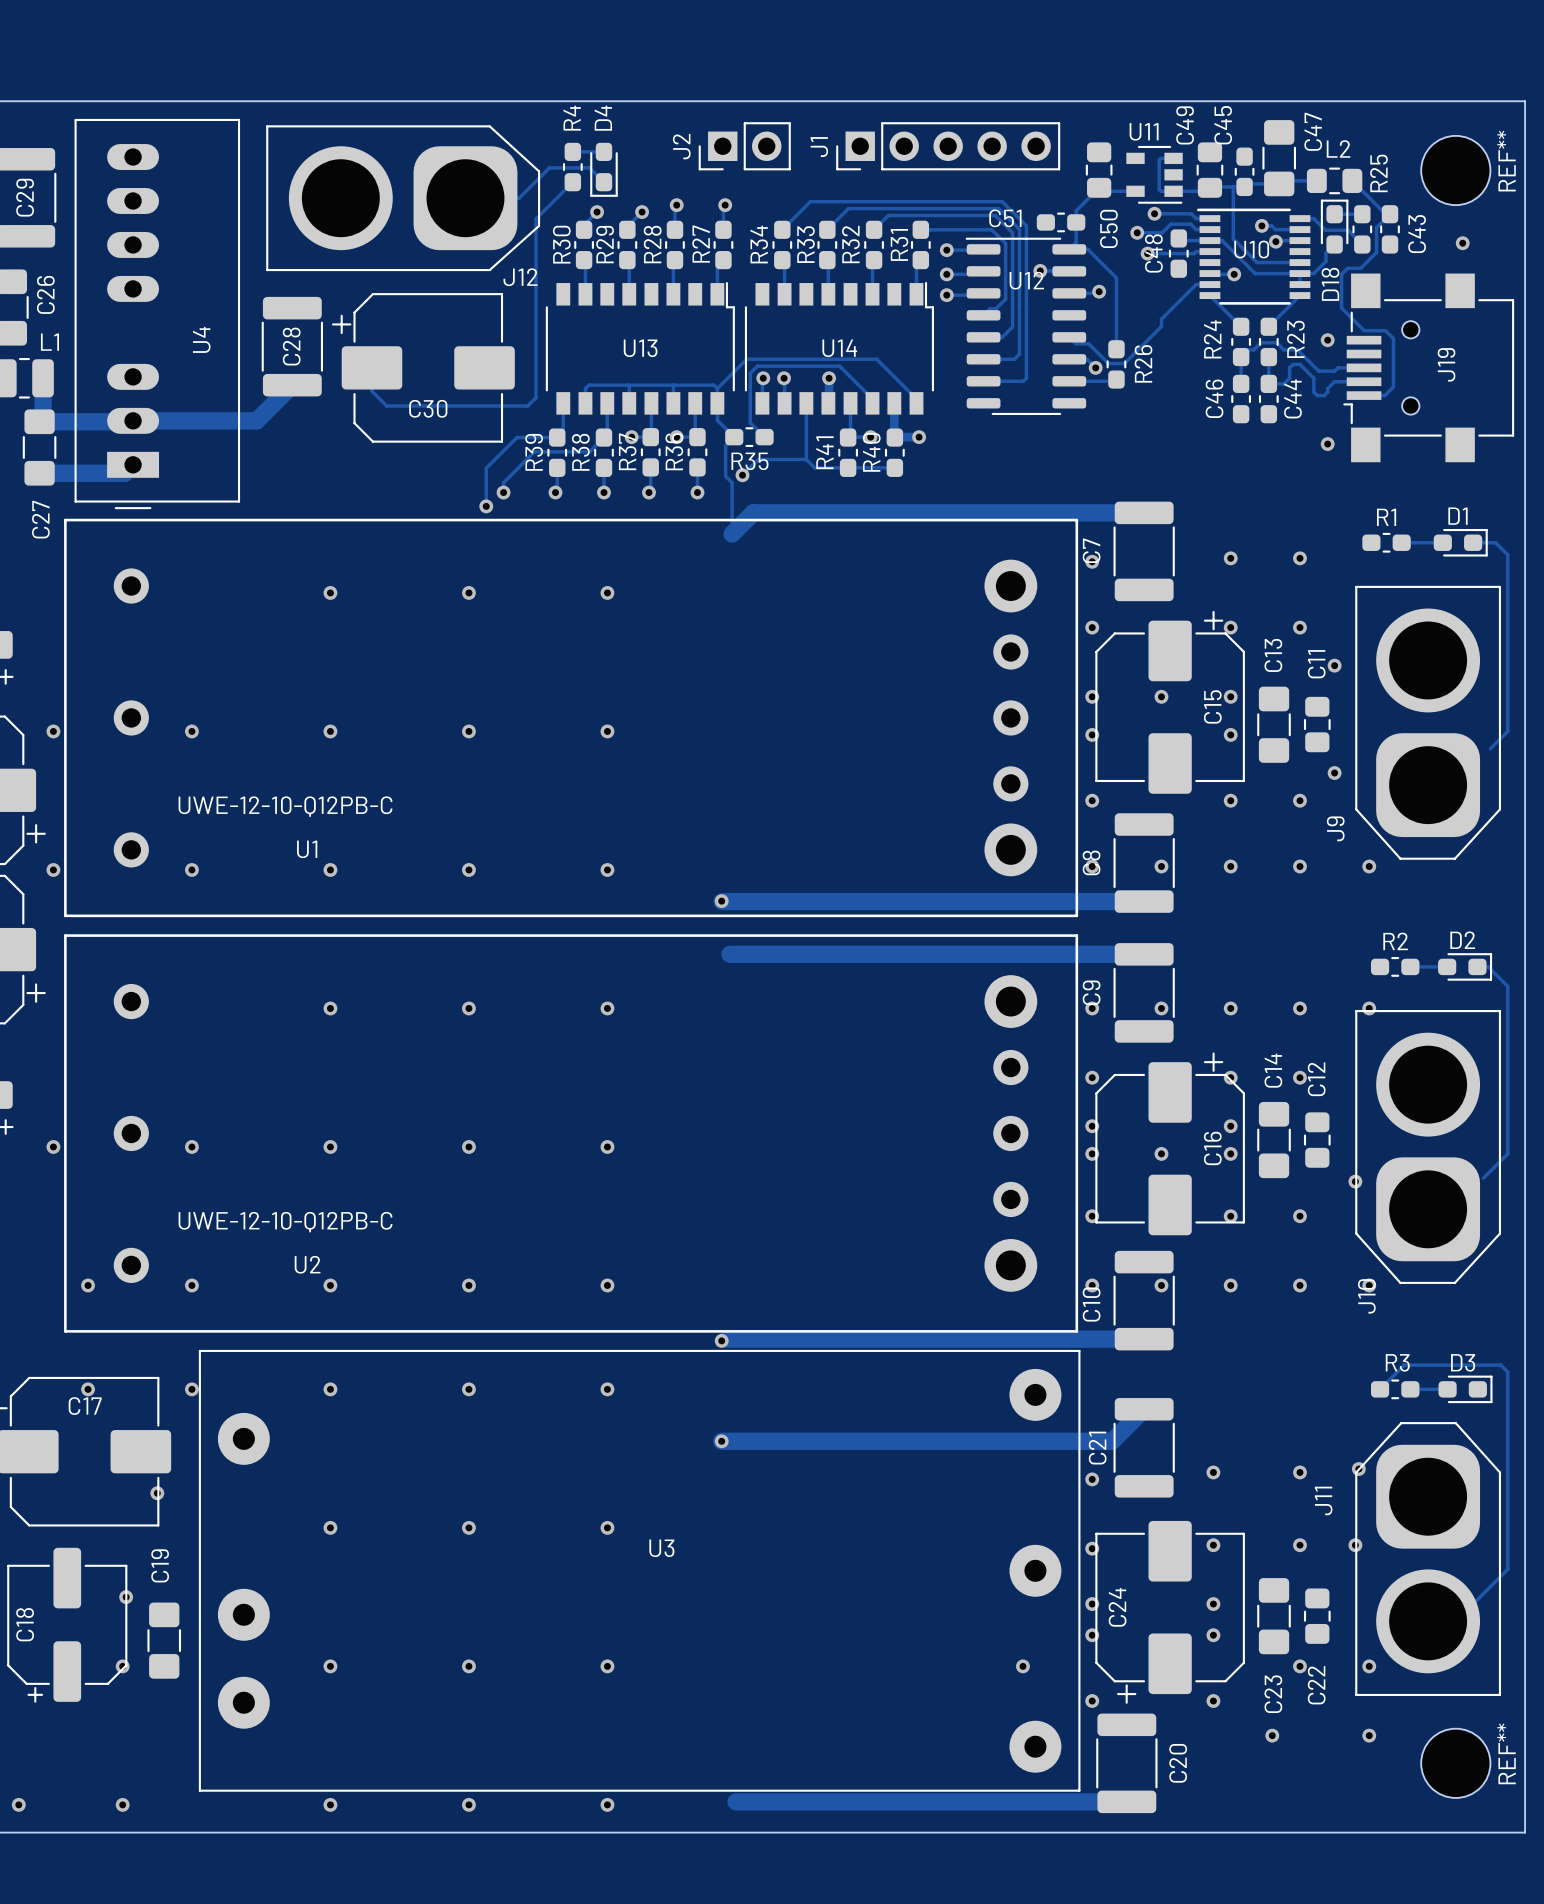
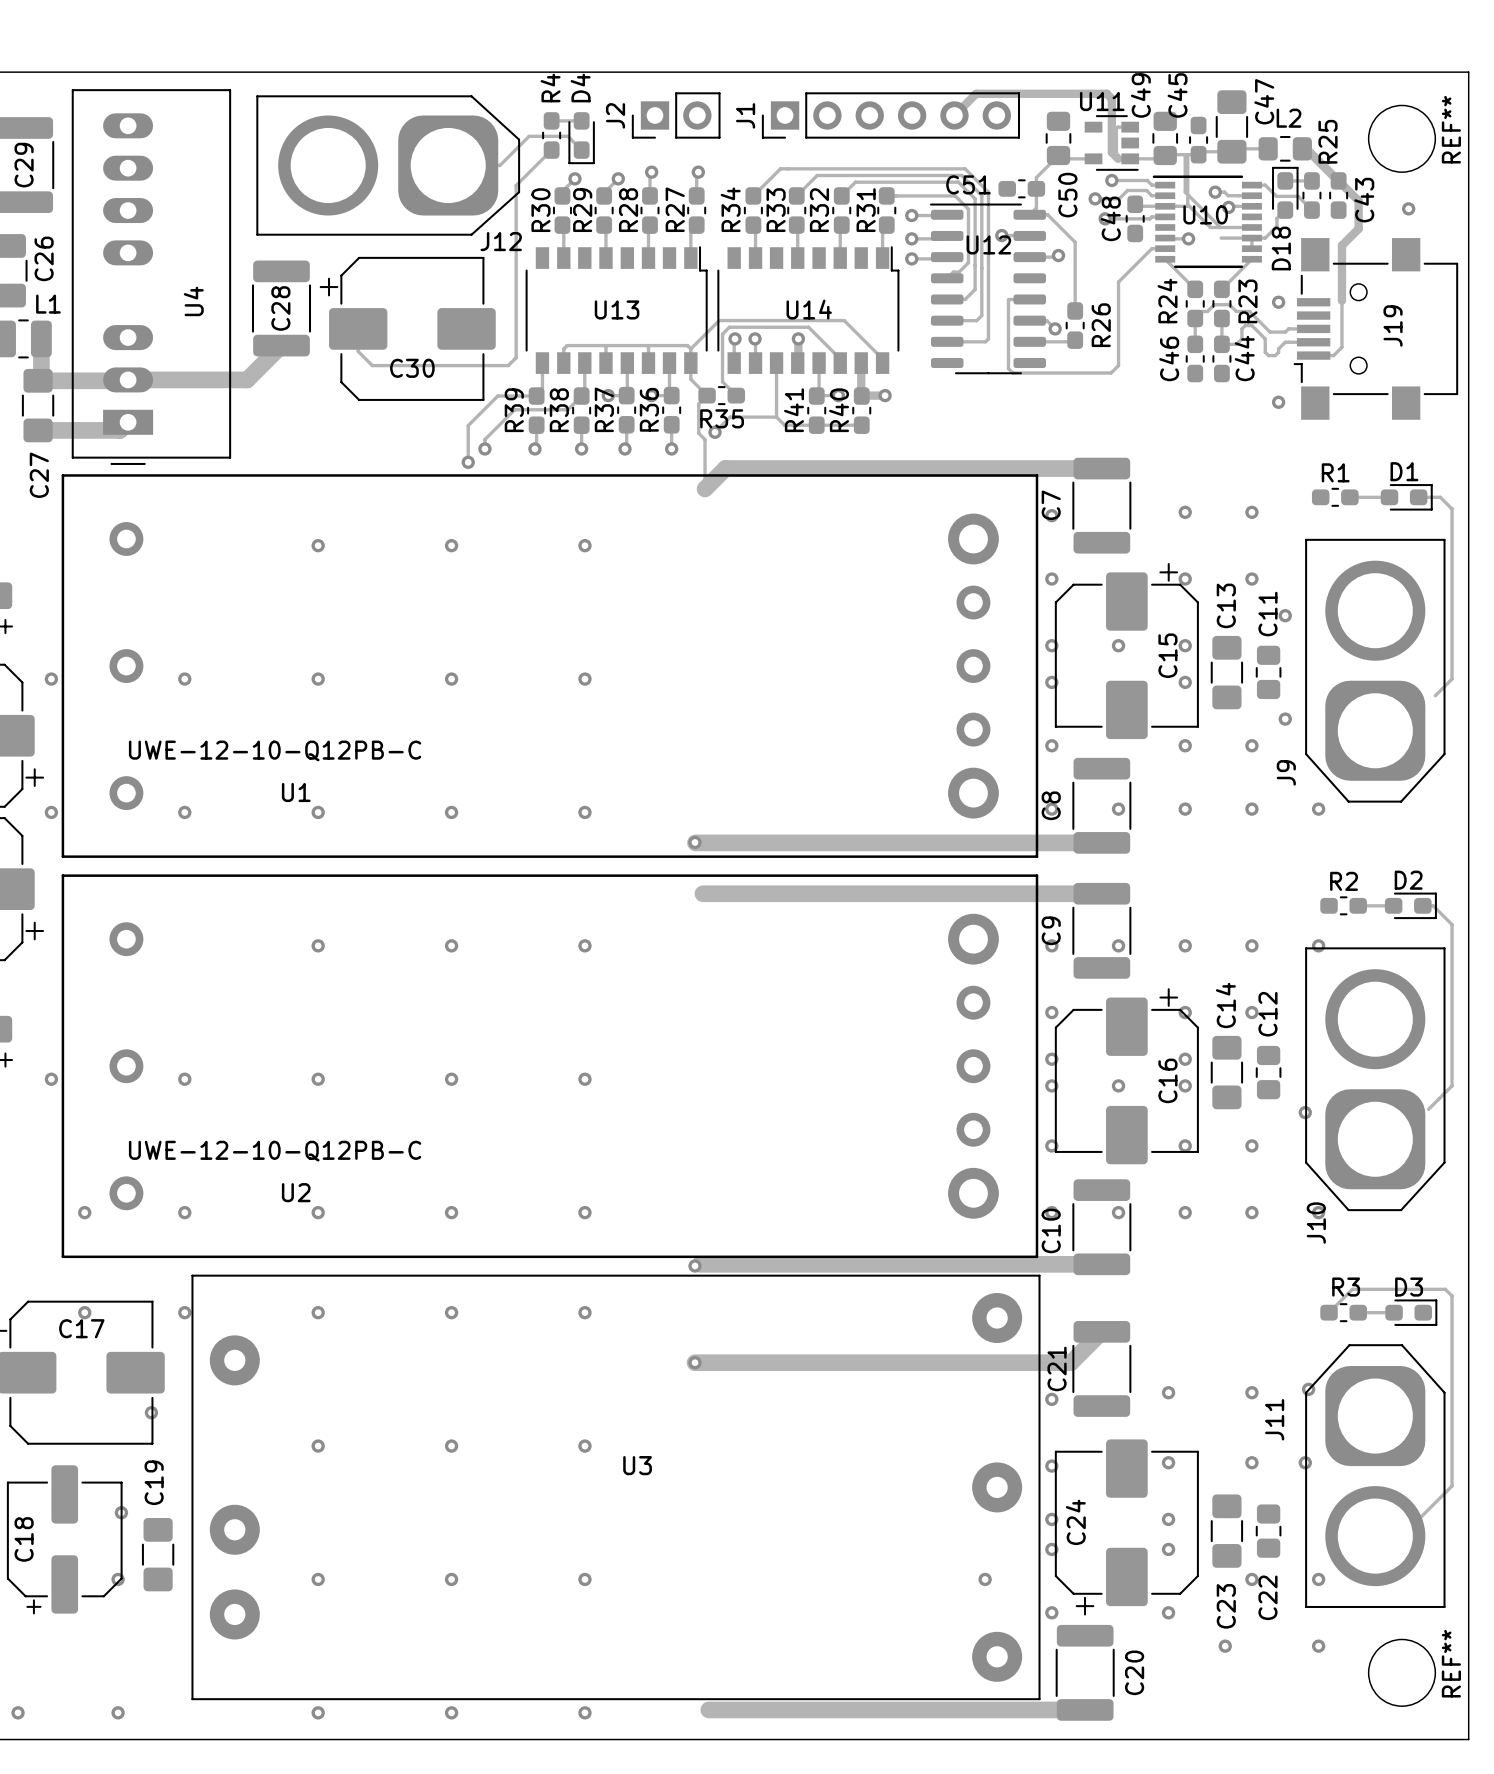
J1 footprint: [836, 122, 1061, 171] -> [761, 92, 1020, 139]
J2 position: (744, 146) -> (676, 115)
track: none -> (954, 115) (976, 93) (1106, 93) (1111, 98) (1111, 152) (1118, 158)
track: none -> (1185, 155) (1185, 192) (1220, 227)
track: (1390, 214) (1376, 227) (1376, 252) (1360, 268) (1347, 268) (1341, 274) (1341, 307) (1364, 330) (1385, 330) (1393, 338) -> (1302, 148) (1306, 148) (1358, 200) (1358, 228) (1341, 245) (1341, 300)
track: (1222, 240) (1255, 273) (1268, 273) -> (1176, 206) (1189, 206)
track: (1161, 326) (1124, 363) (1108, 363) (1088, 343) (1075, 343) (1069, 337) -> (1118, 289) (1118, 365) (1111, 373) (1012, 373) (1008, 368) (1008, 300) (1029, 299)

